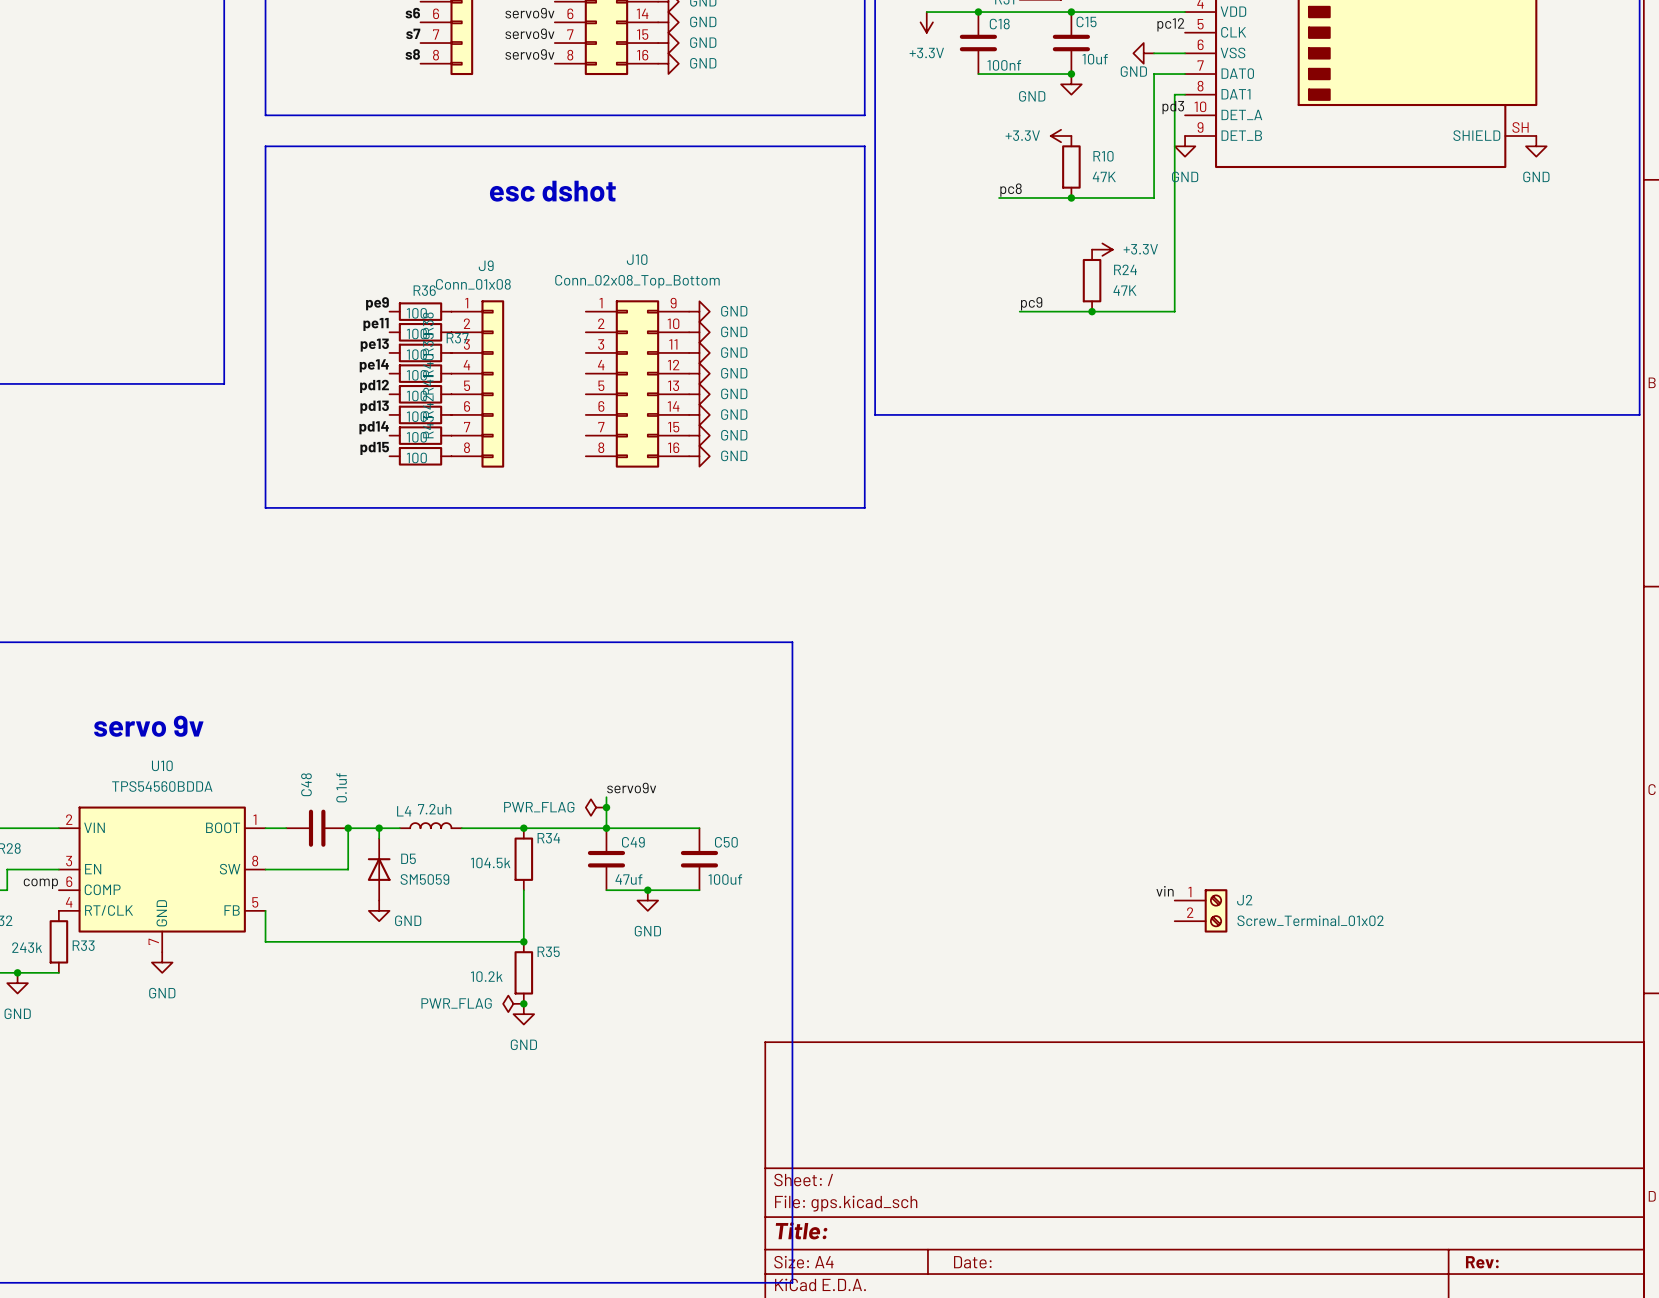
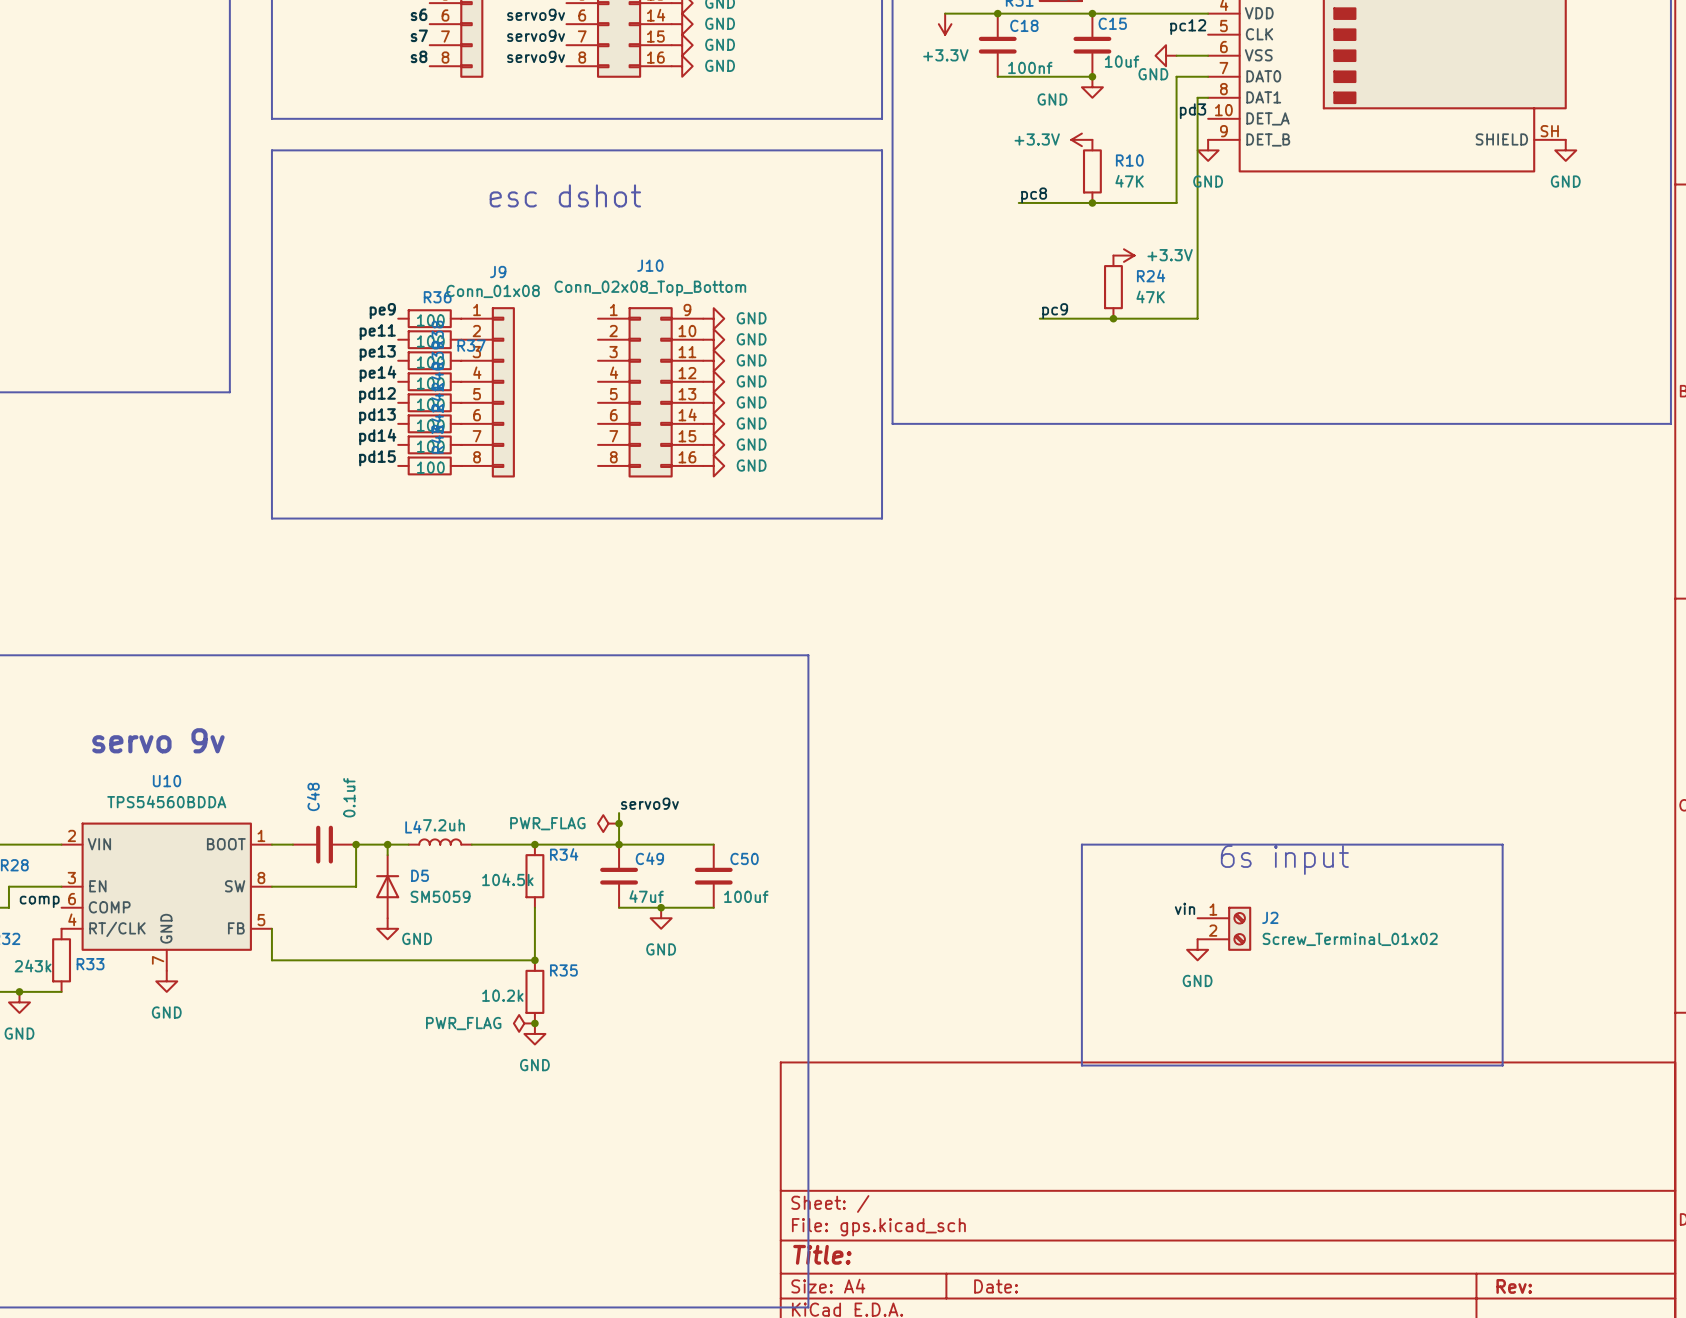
line: none -> (1081, 844) (1502, 844) (1502, 1065) (1081, 1065) (1081, 844)
text: none -> 6s input (1284, 860)
power symbol: none -> GND (1197, 949)

